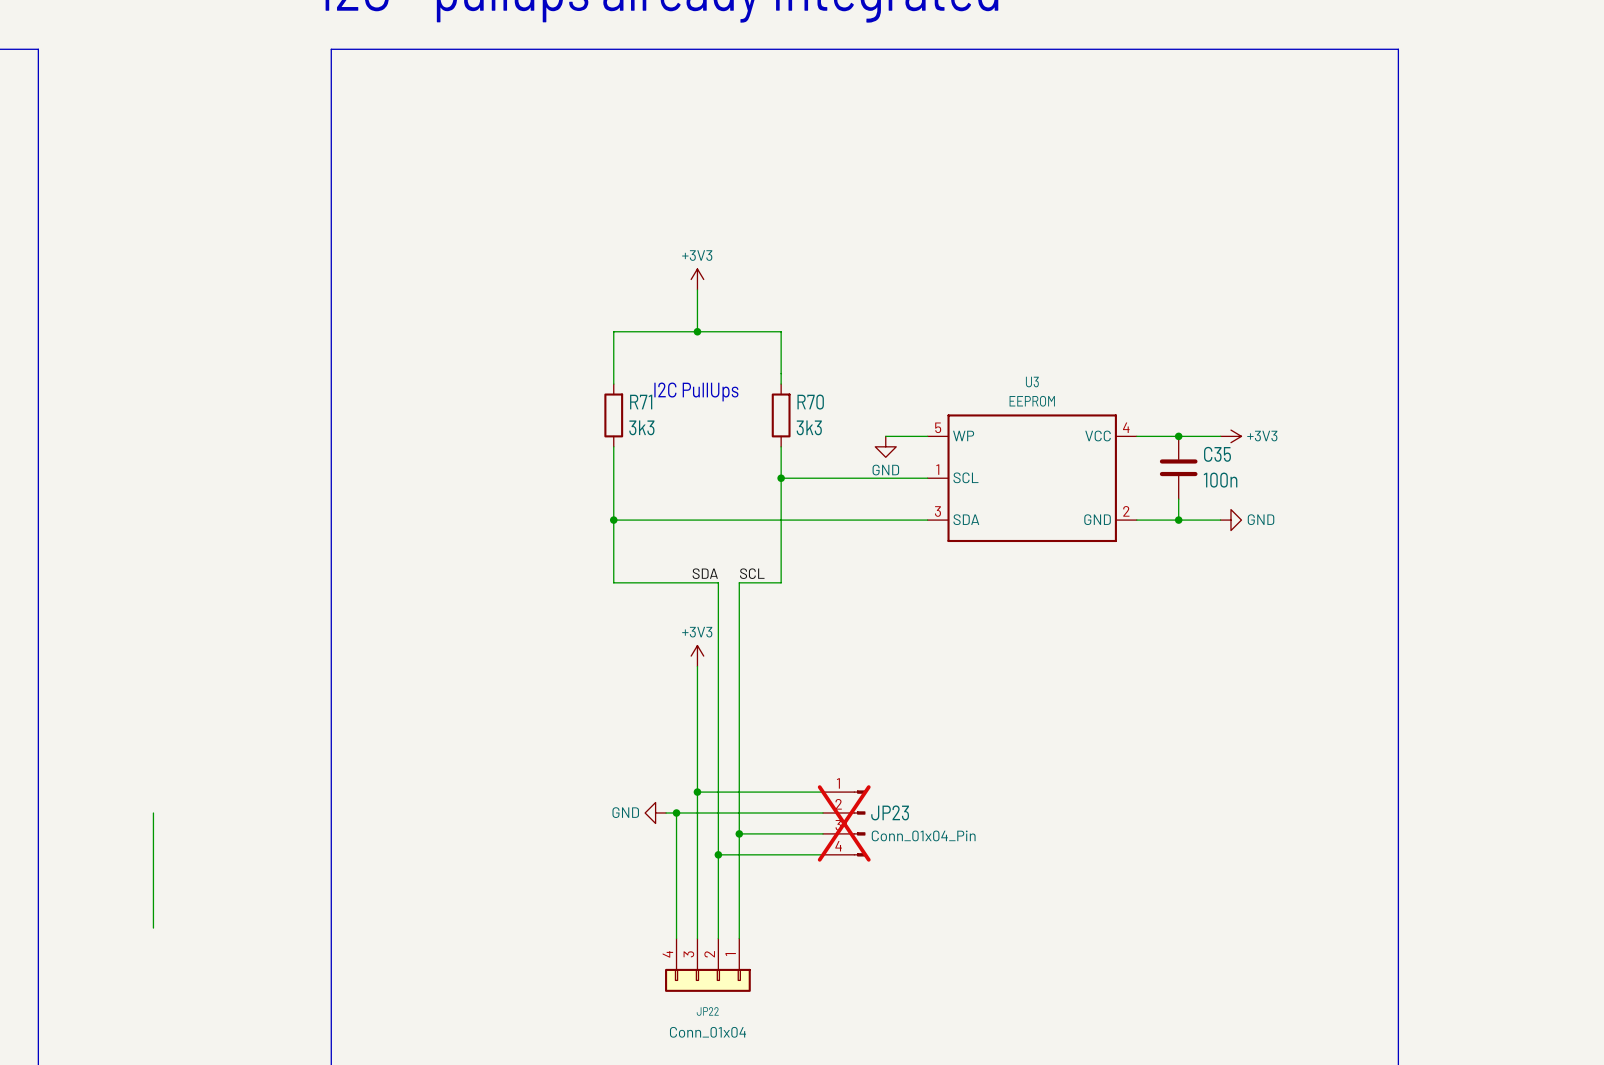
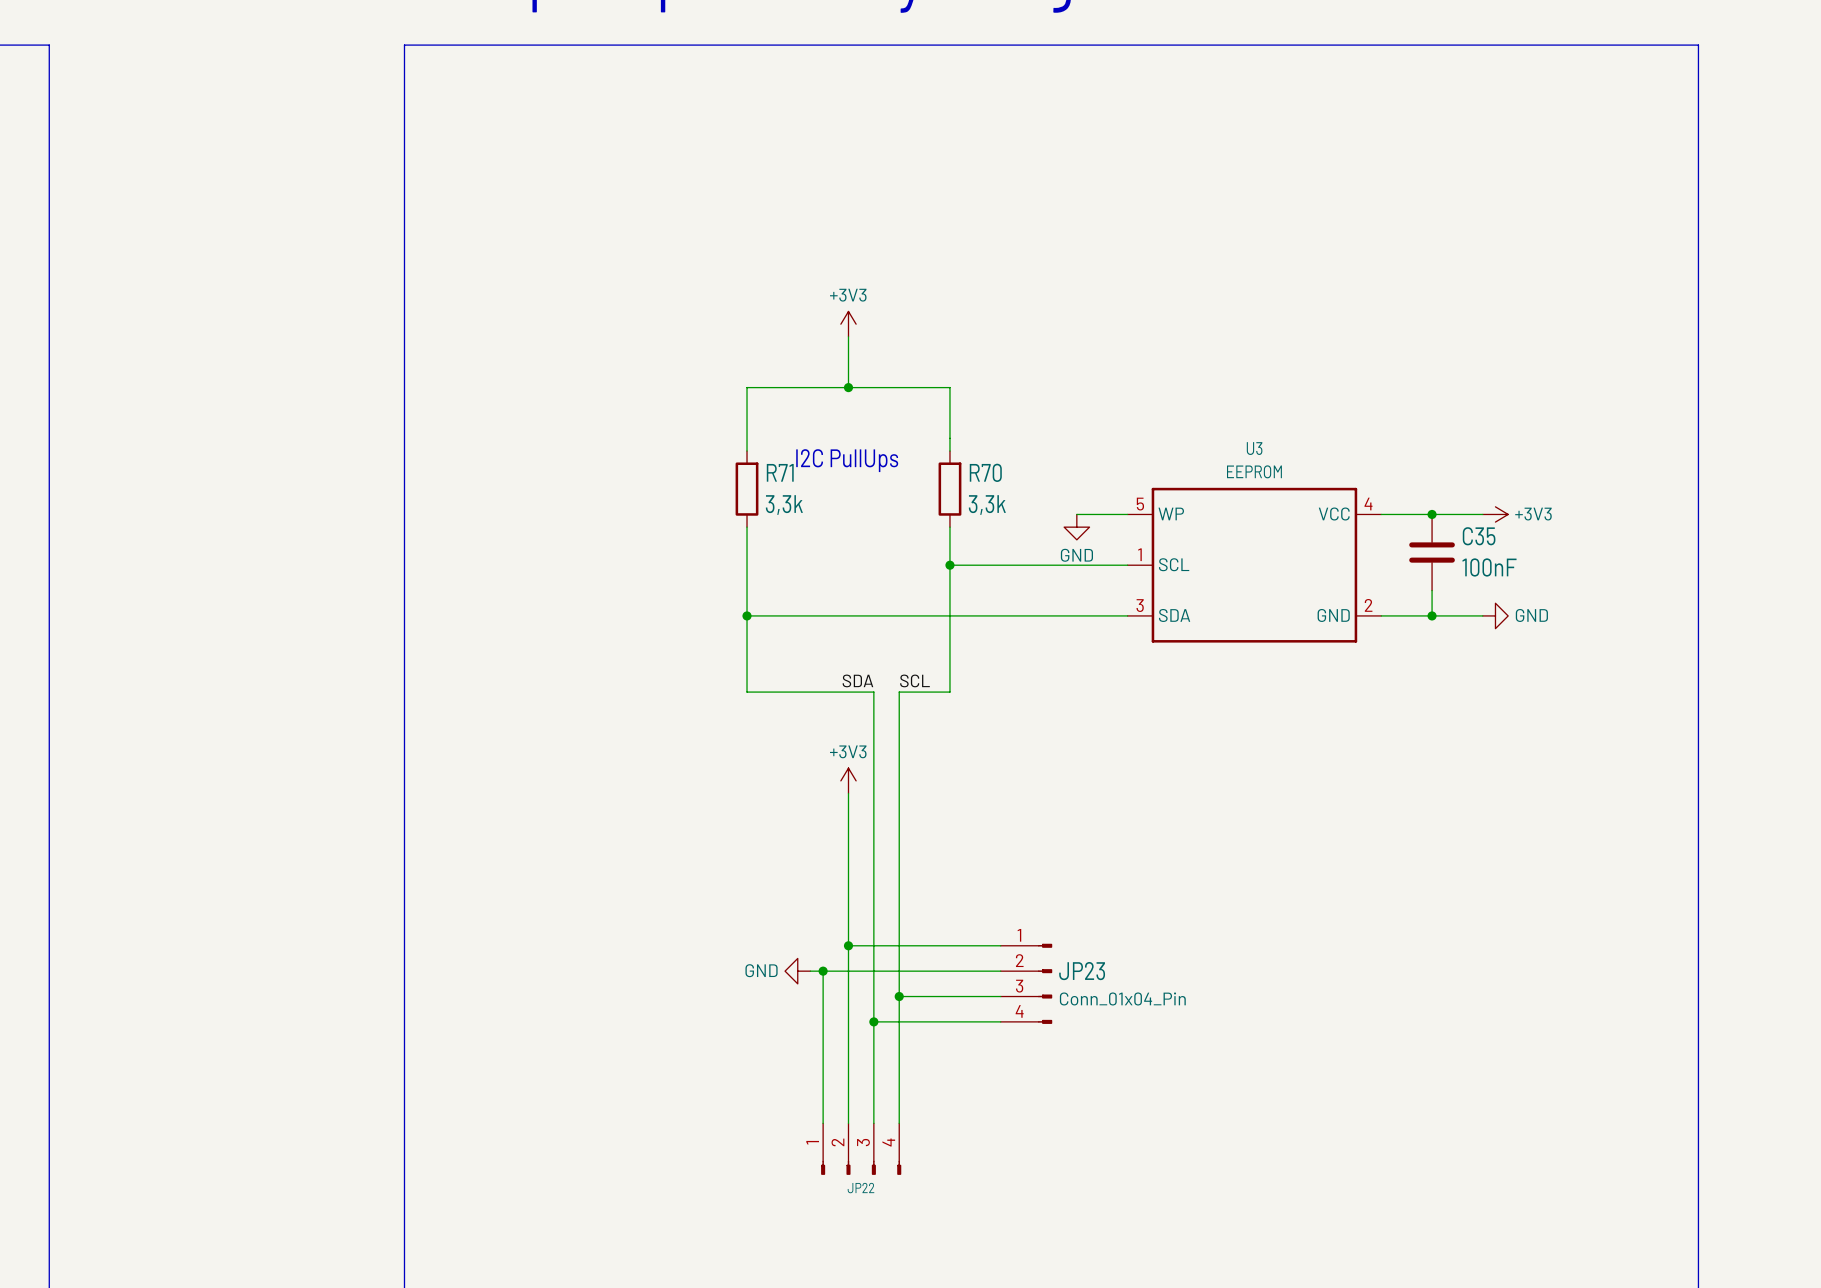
R71 value: 3k3 (641, 427) -> 3,3k (784, 505)
R70 value: 3k3 (809, 427) -> 3,3k (987, 505)
C35 value: 100n (1220, 480) -> 100nF (1489, 567)
wire: (153, 812) (153, 928) -> none
JP23 do-not-place cross: (844, 823) -> none
JP22 symbol: [665, 938, 751, 992] -> [821, 1123, 902, 1175]
JP22 value: Conn_01x04 (707, 1032) -> none

